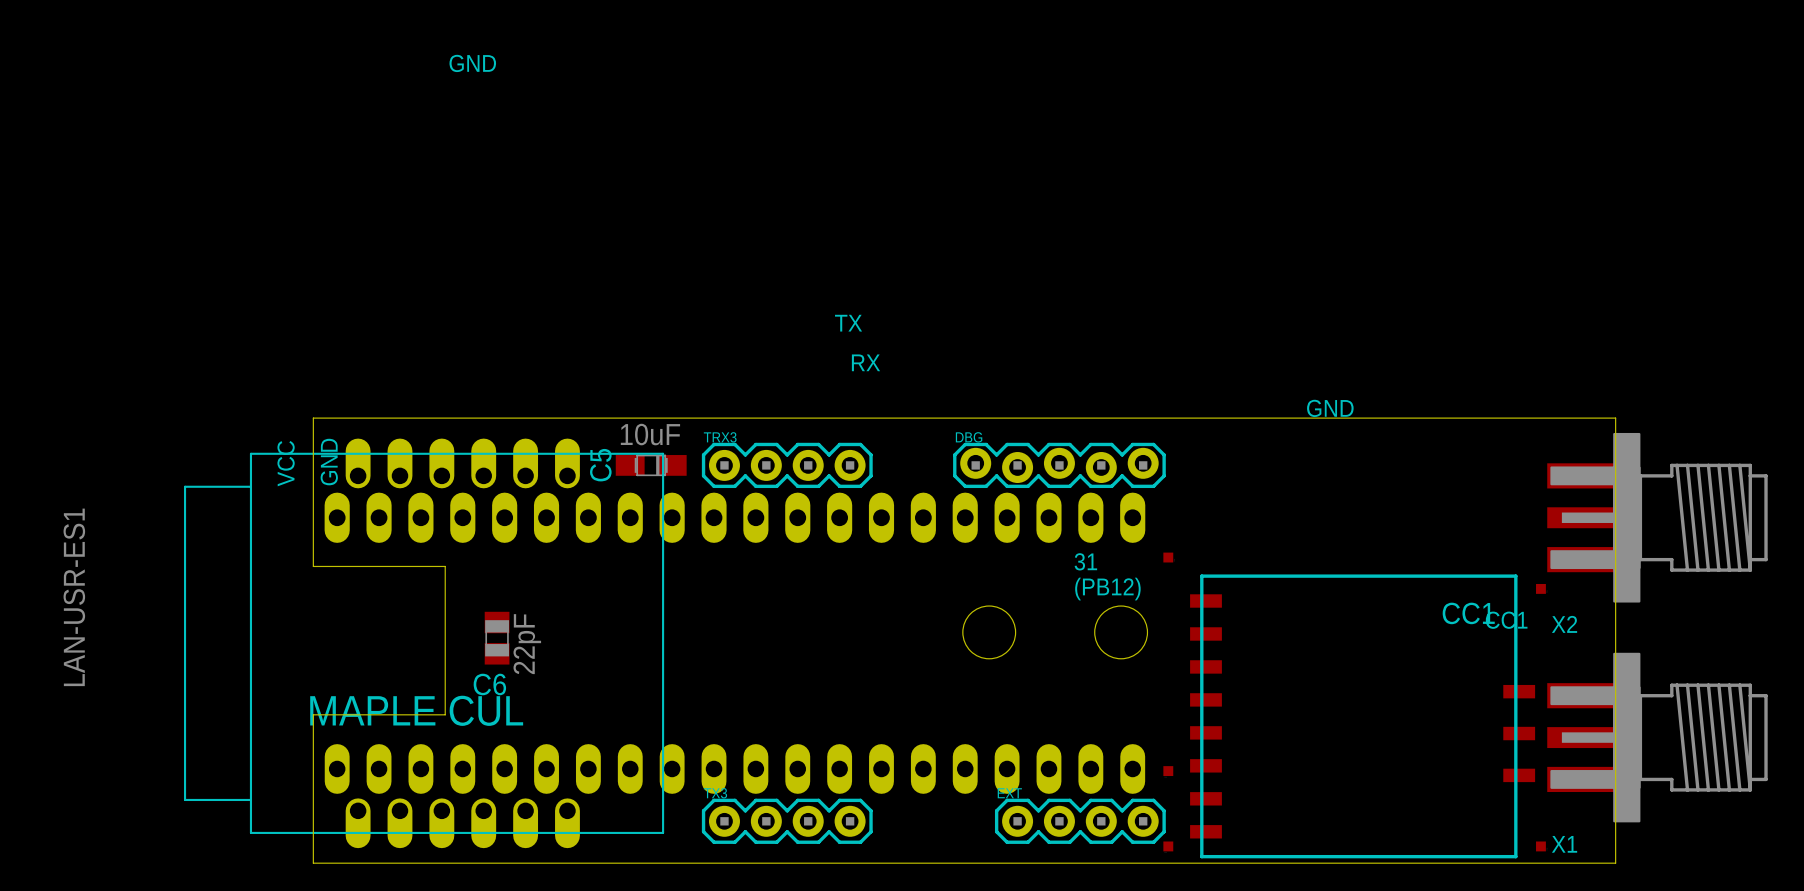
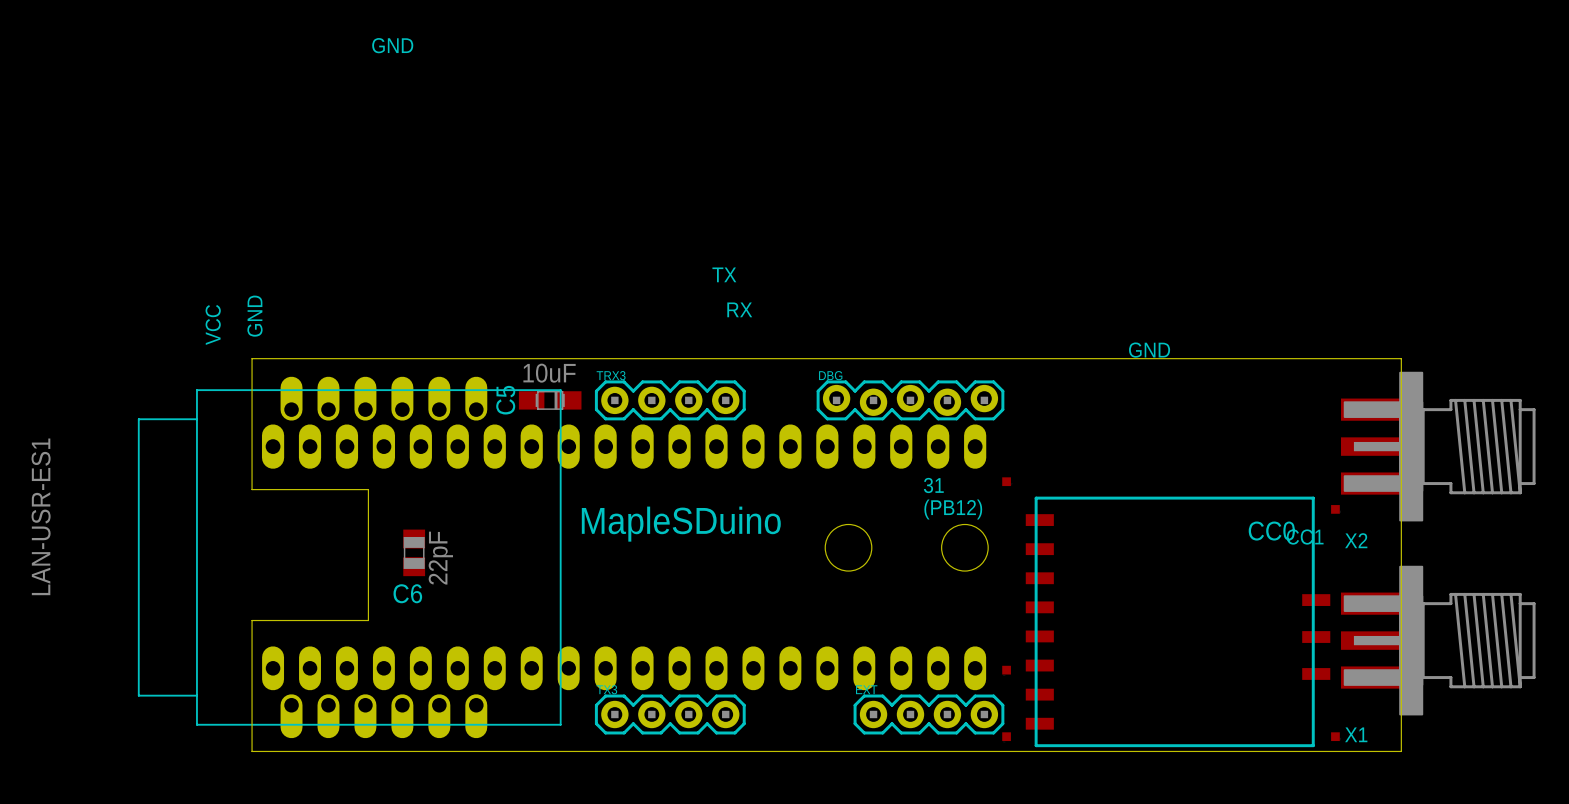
text position: GND (329, 462) -> GND (254, 316)
text position: VCC (286, 463) -> VCC (213, 324)
text: none -> MapleSDuino (681, 524)
CC1 name: CC1 (1468, 613) -> CC0 (1271, 531)
text: MAPLE CUL (416, 710) -> none

